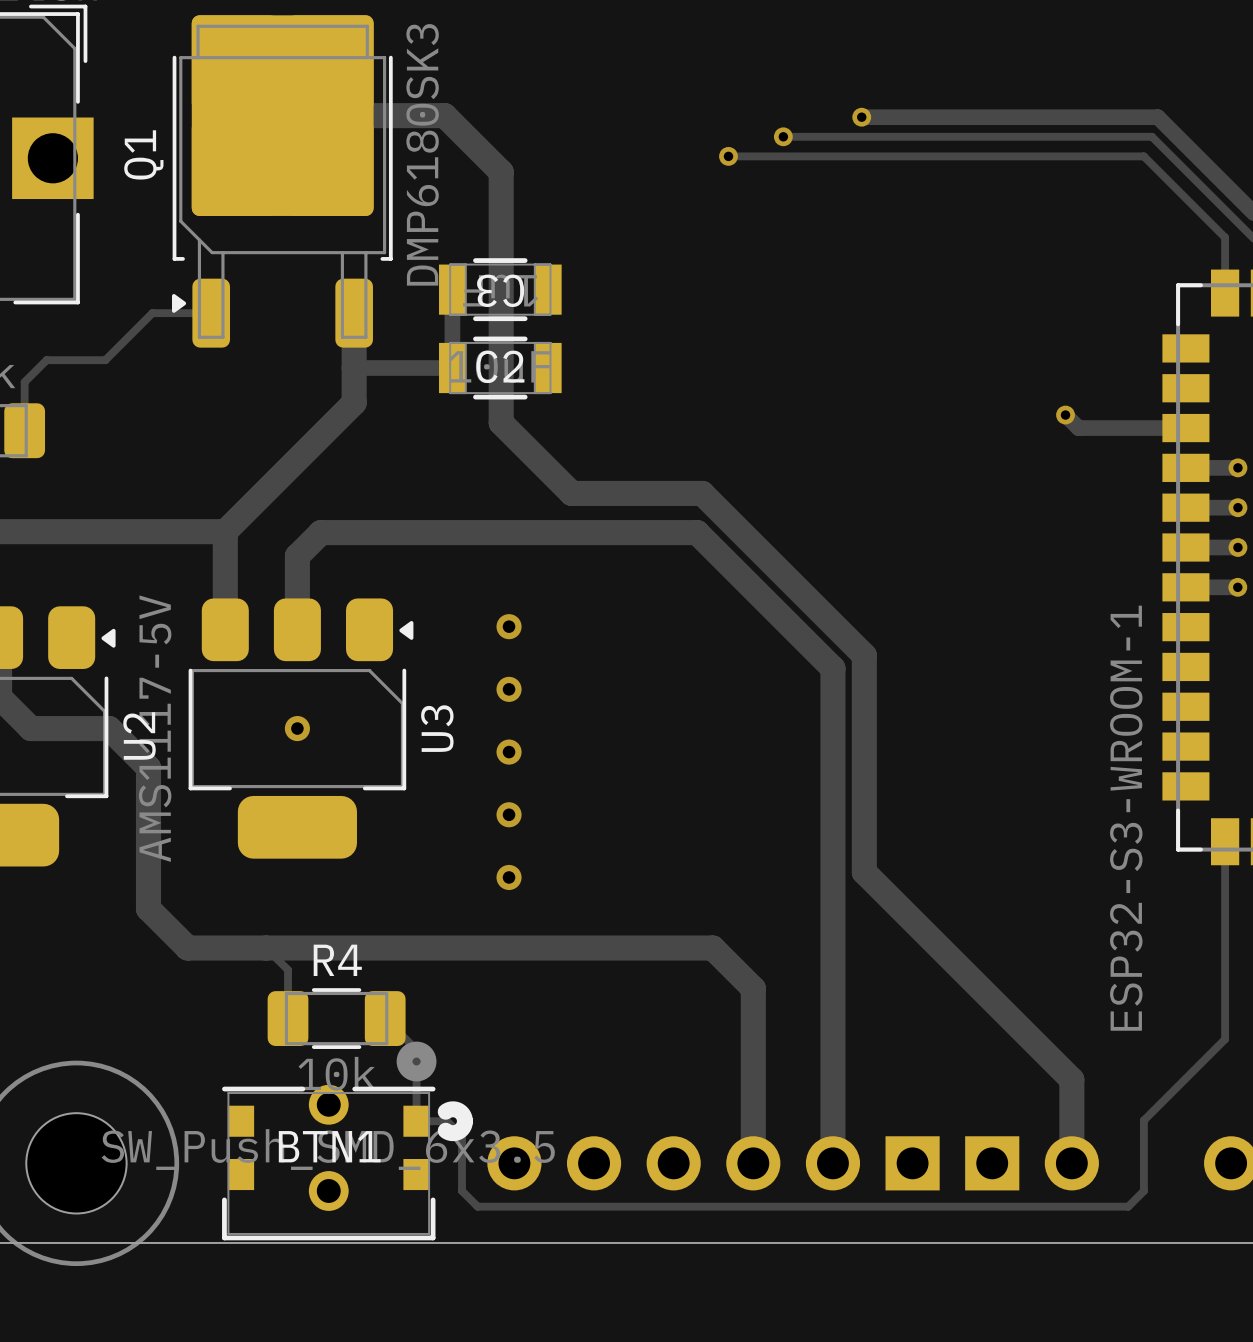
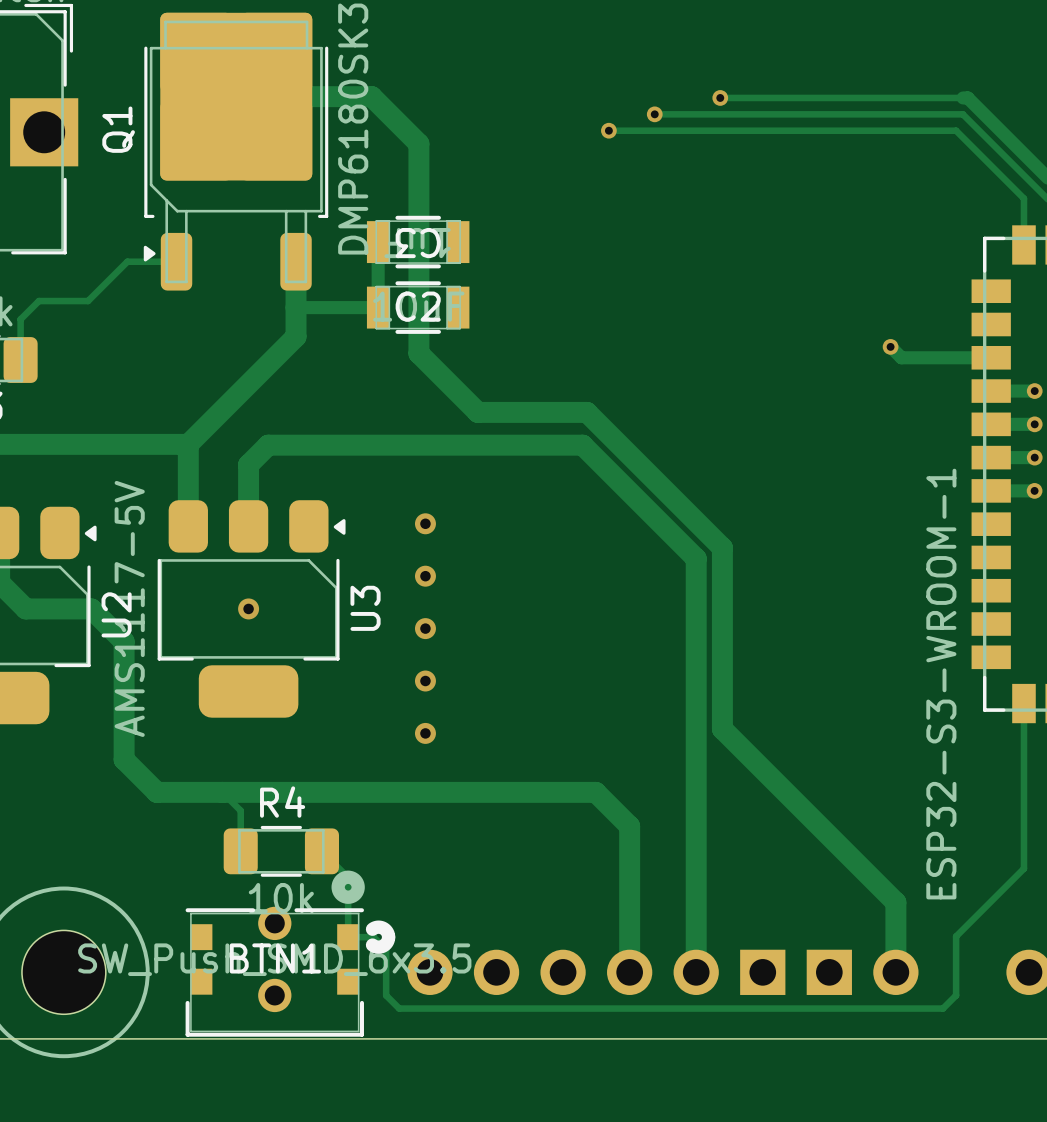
track width: thick (861, 117) (1152, 117) -> thin (720, 97) (963, 97)

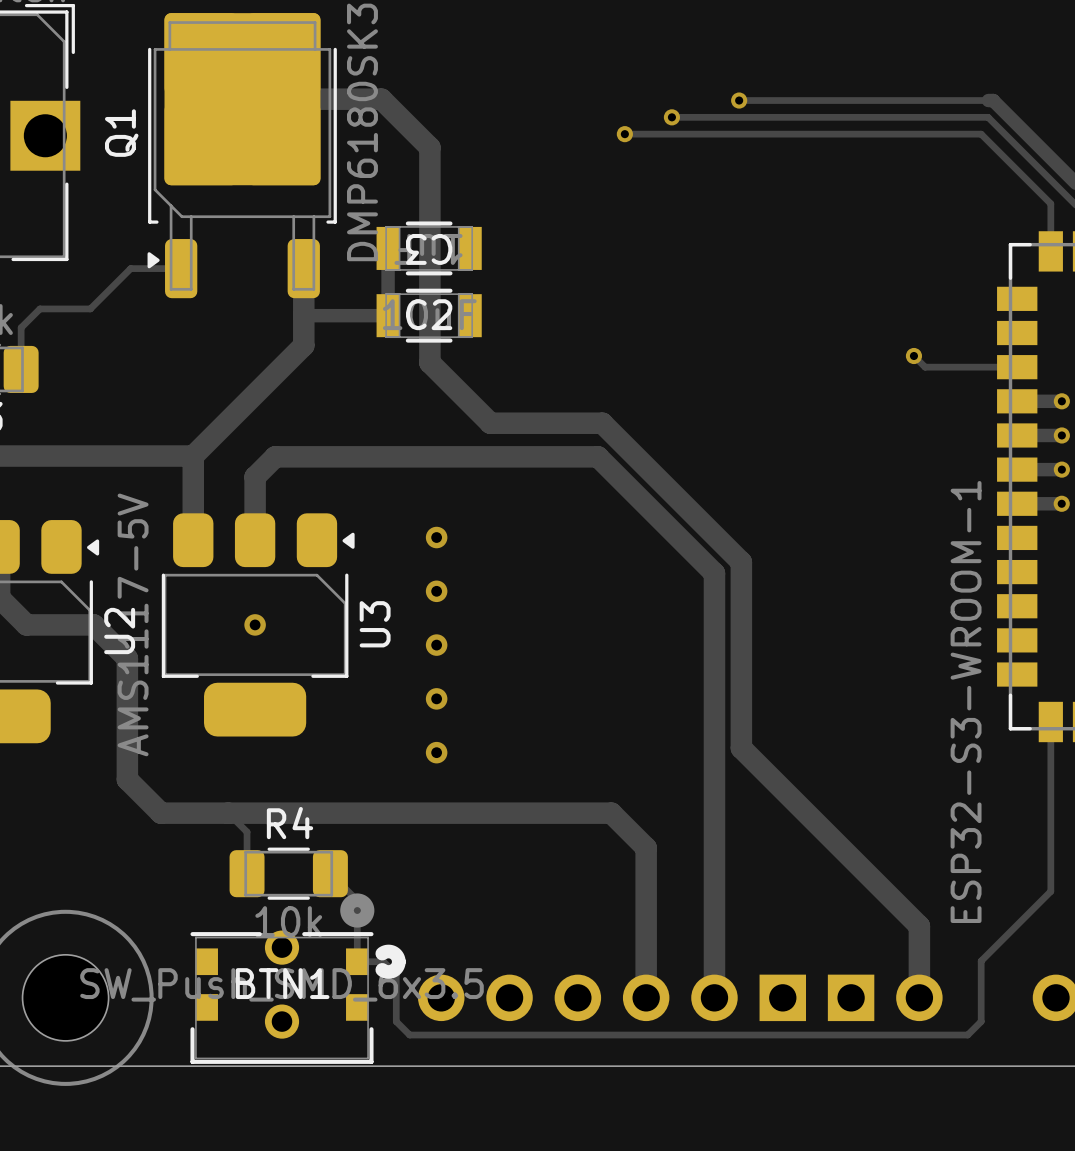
track width: thick (890, 346) (901, 357) (991, 357) -> thin (913, 356) (925, 367) (1017, 367)

